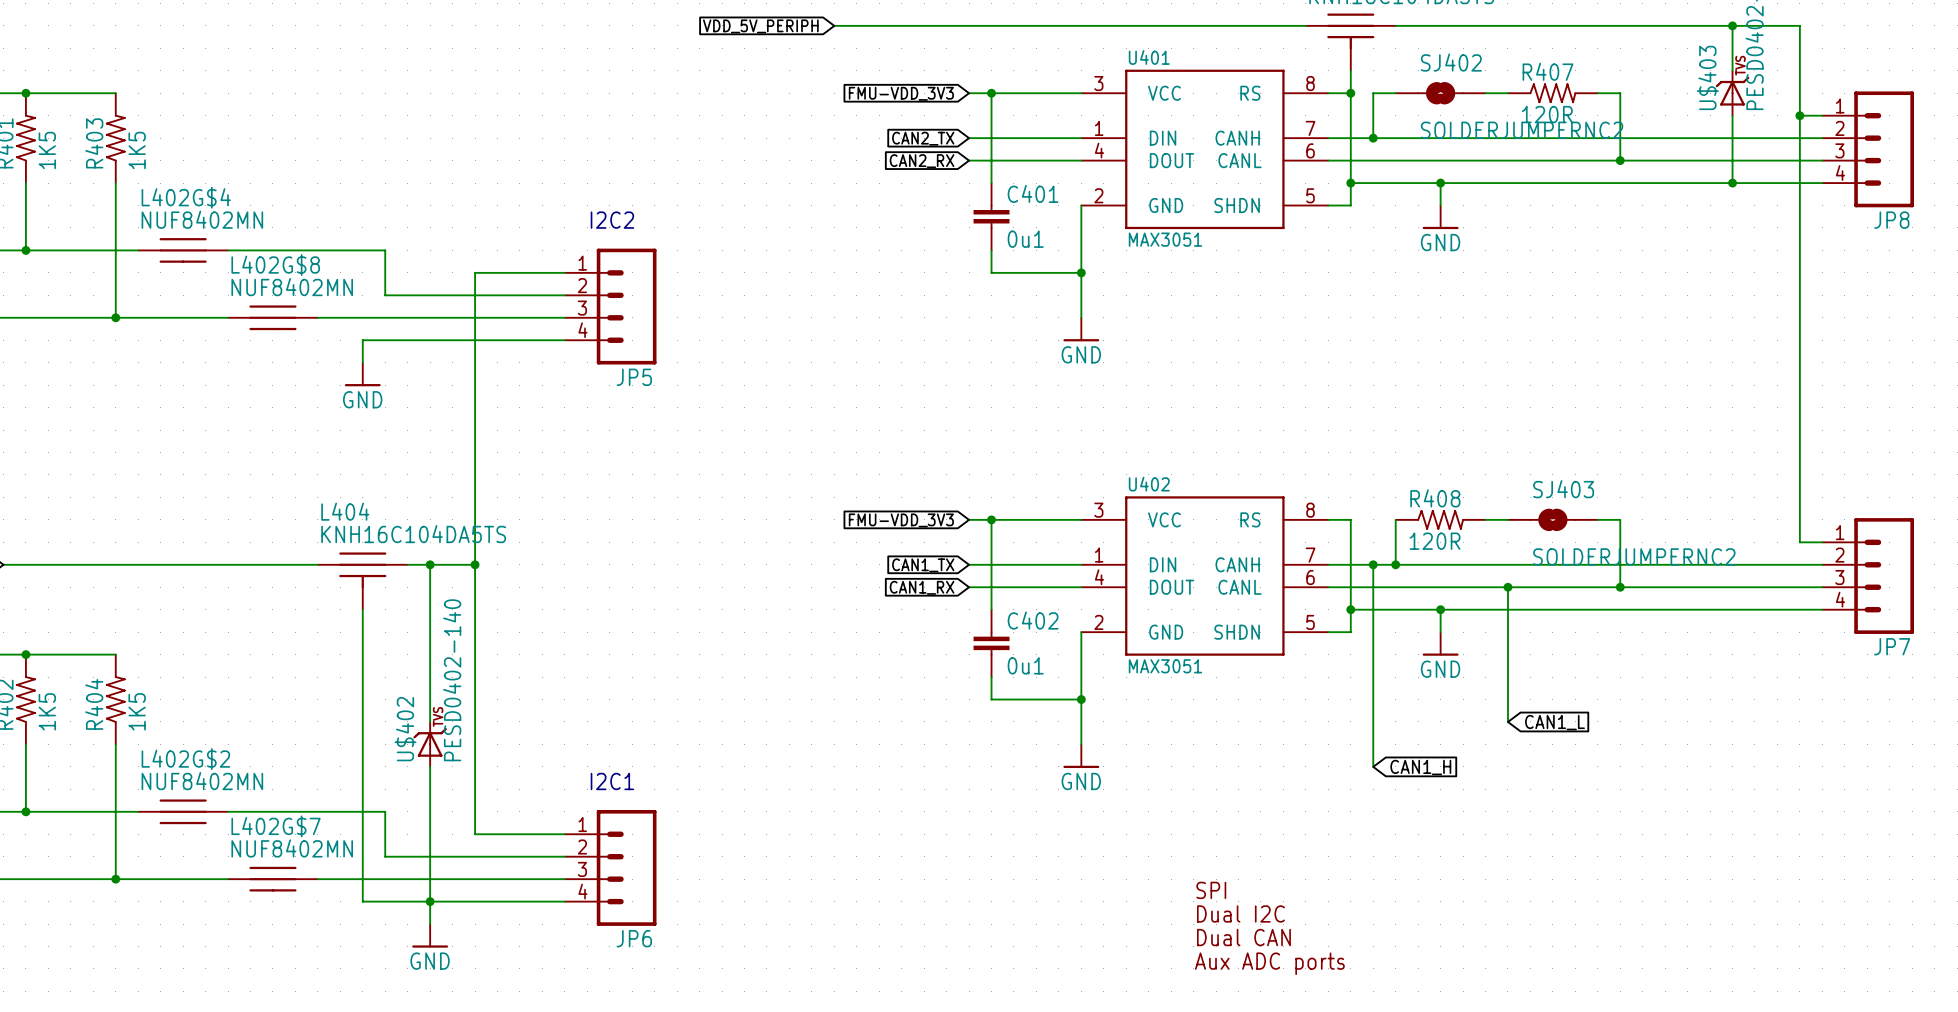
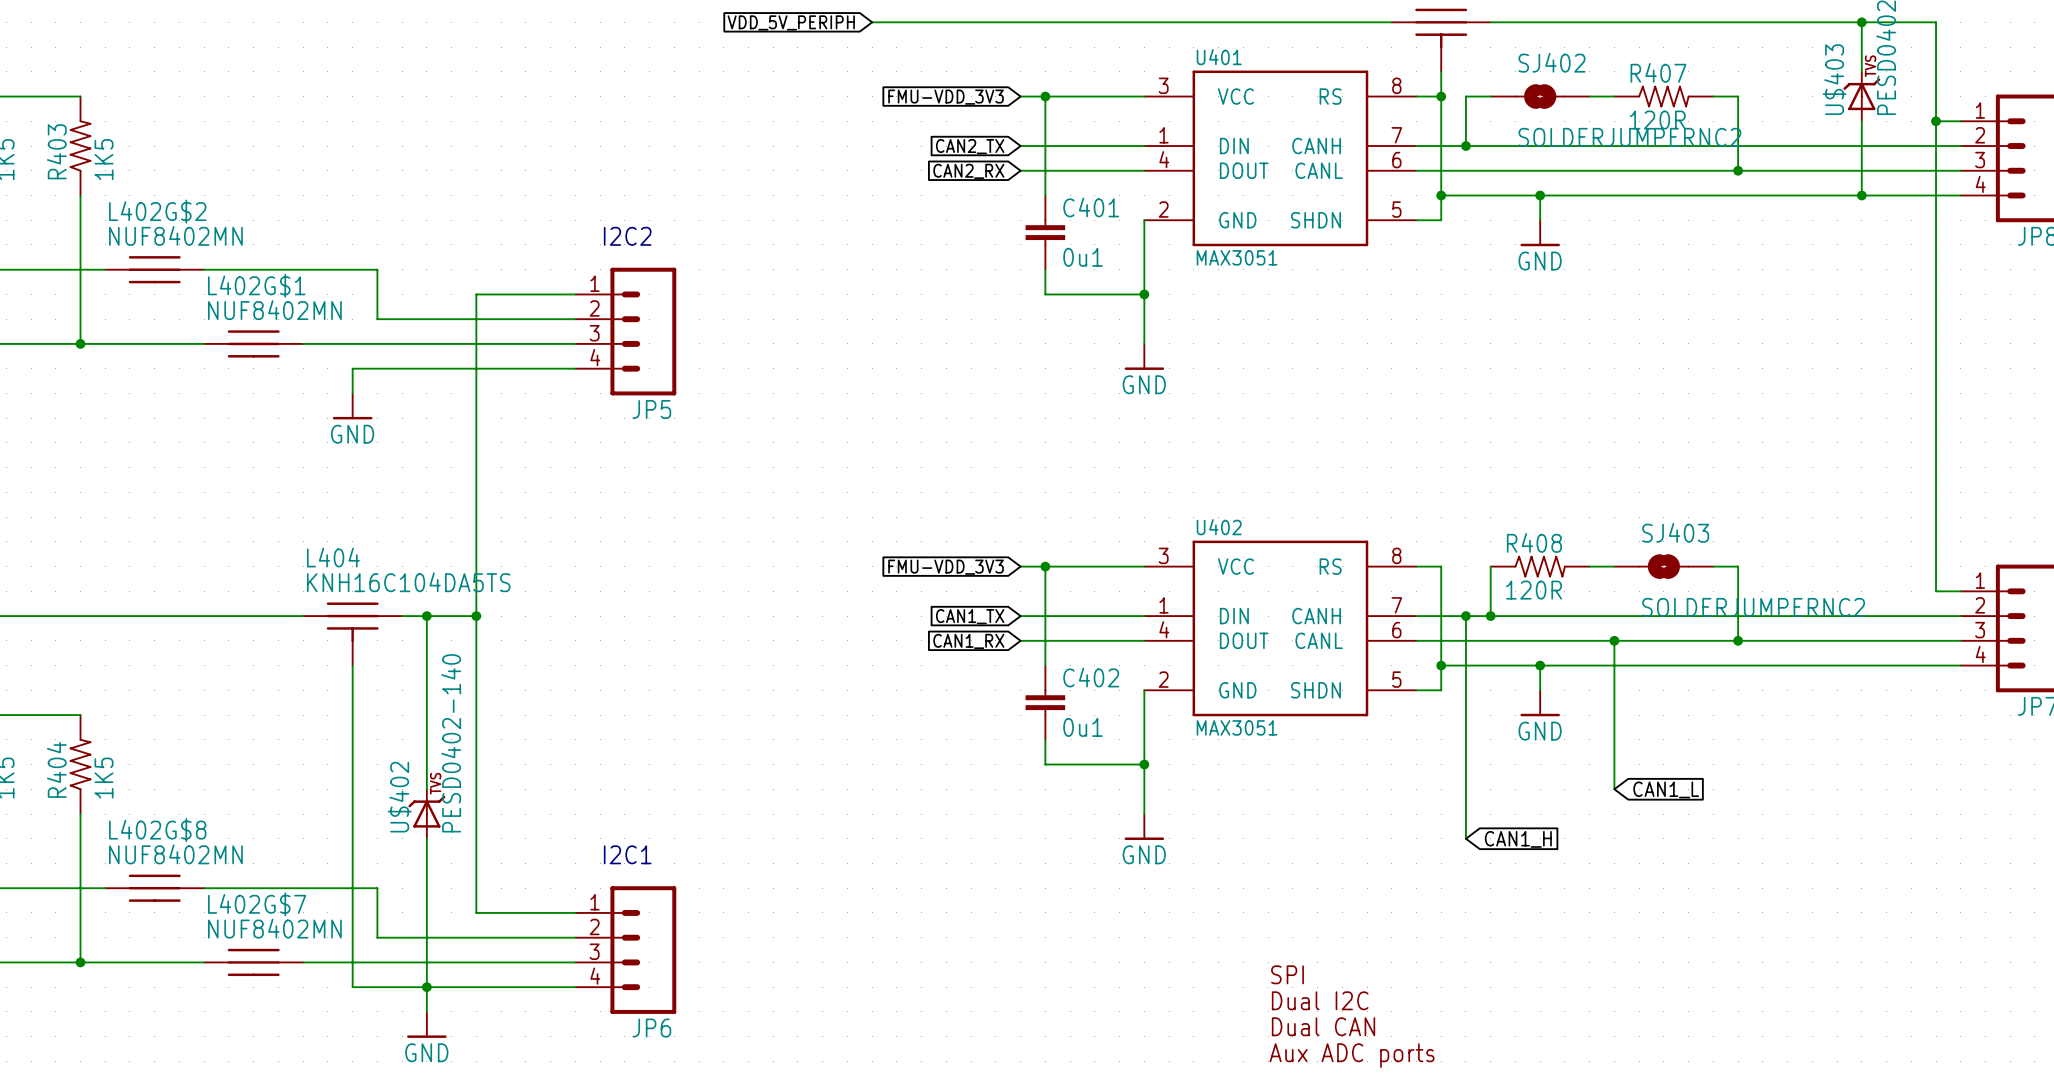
L402G$4 name: L402G$4 (186, 197) -> L402G$2 (157, 211)
L402G$8 name: L402G$8 (275, 265) -> L402G$1 (256, 285)
L402G$2 name: L402G$2 (185, 759) -> L402G$8 (157, 830)

